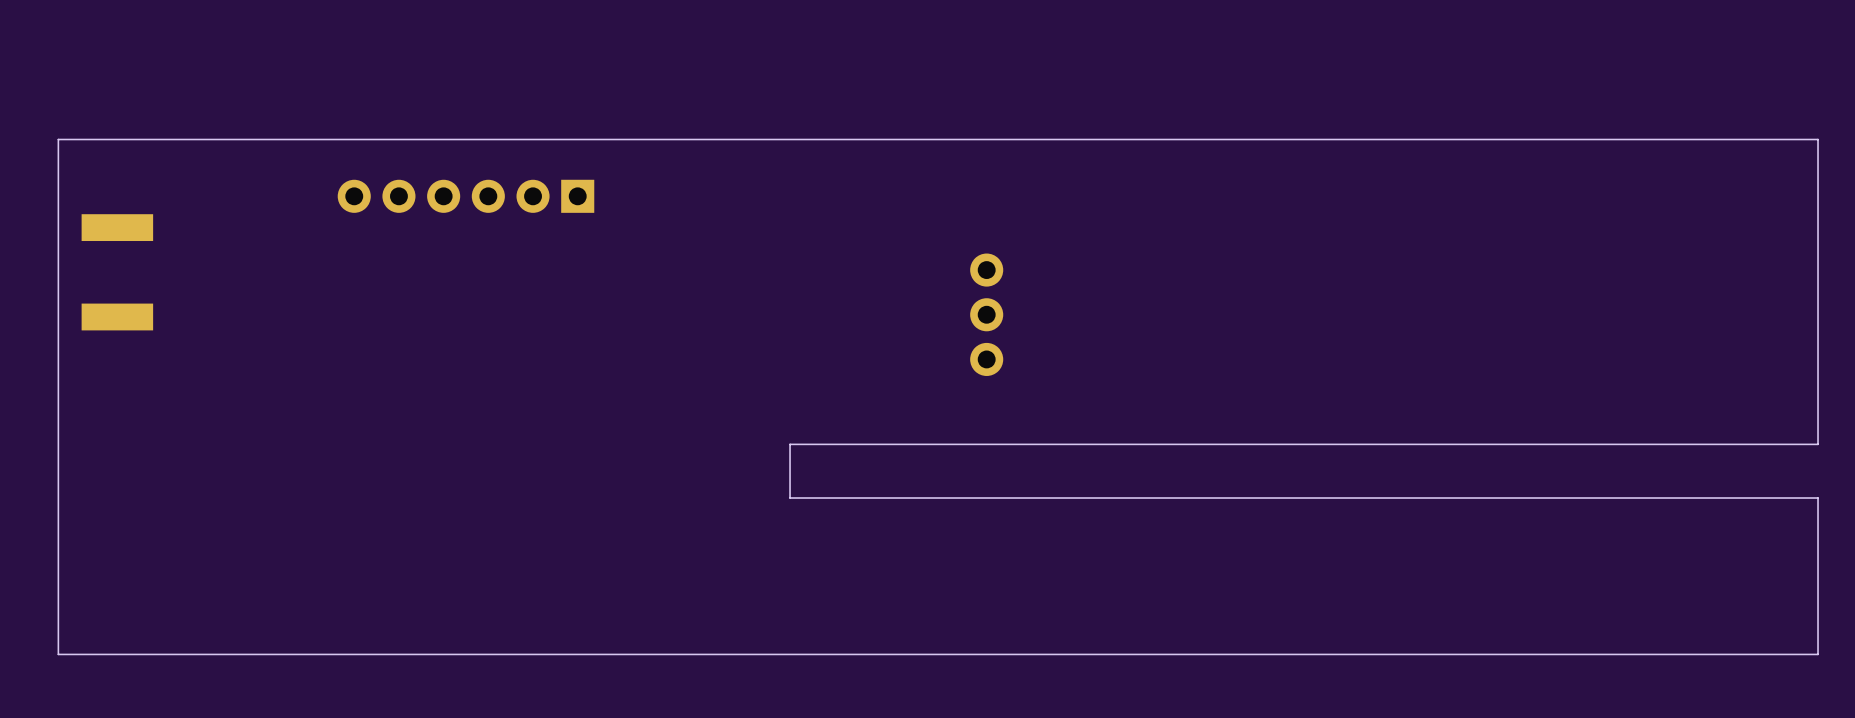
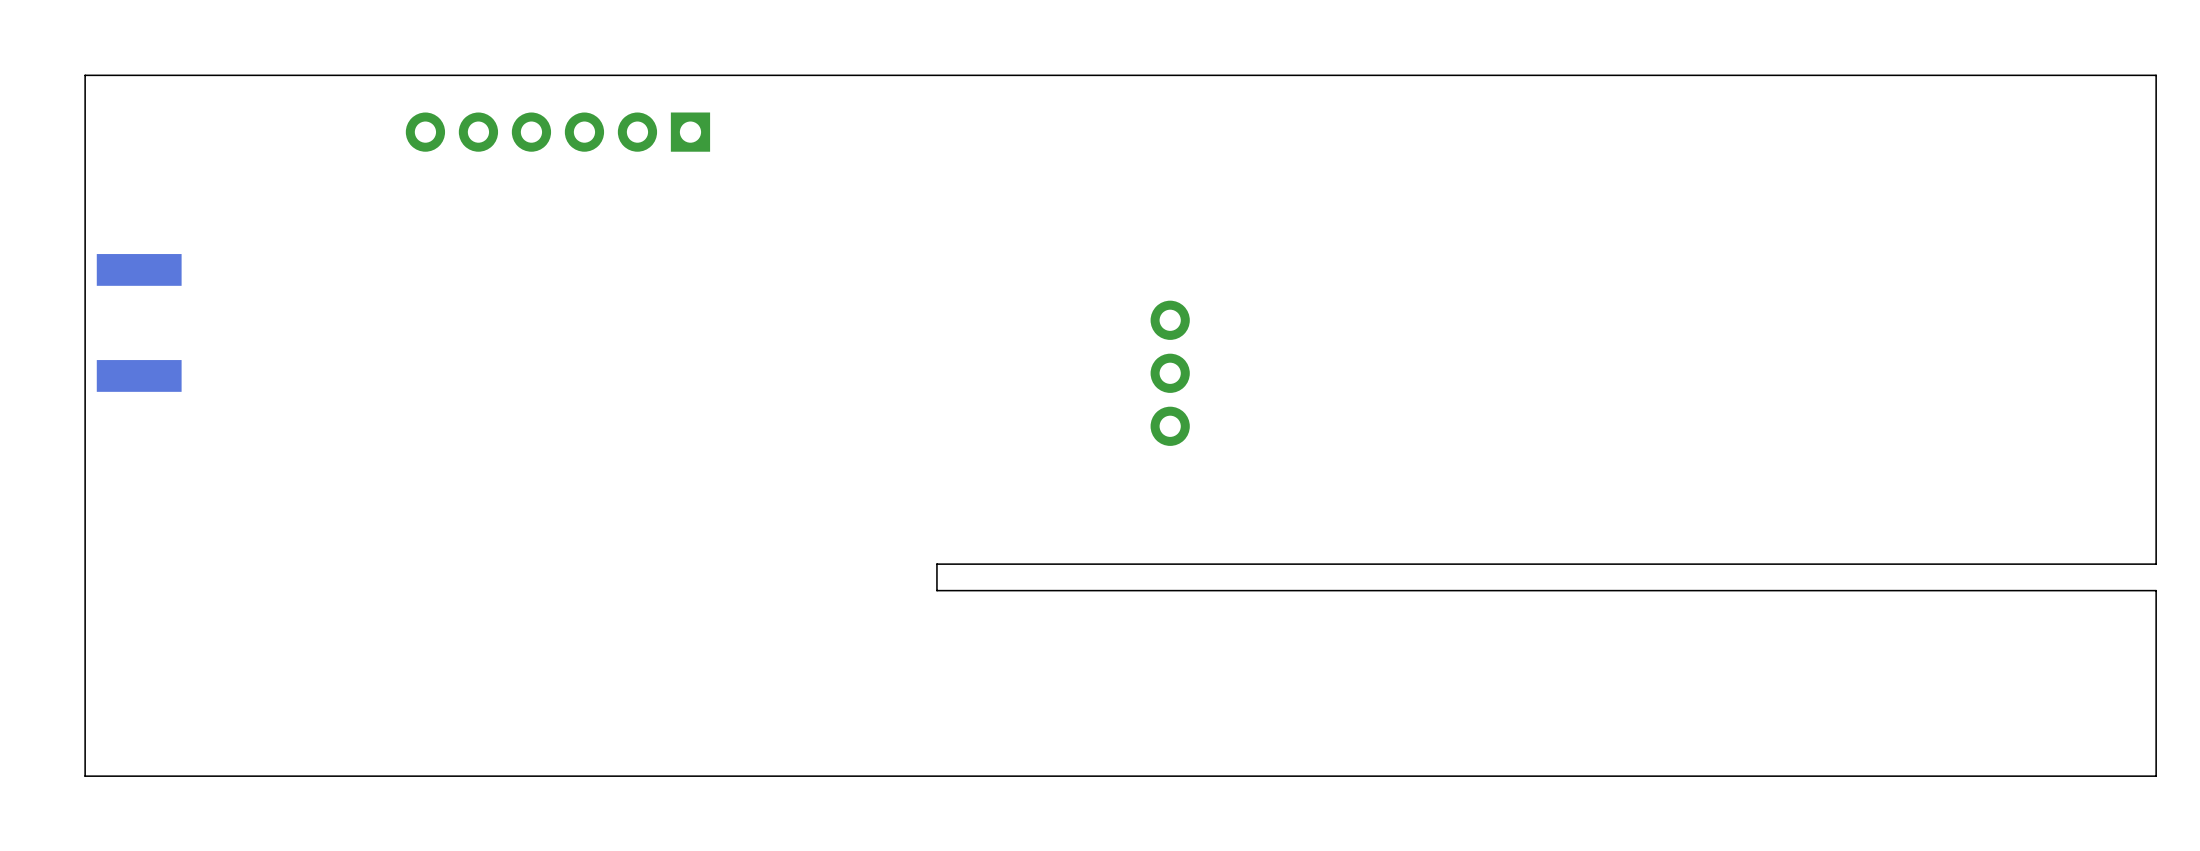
board edge: (1818, 139) (58, 139) (58, 654) (71, 654) -> (2156, 165) (2156, 75) (85, 75) (85, 776)
part position: (465, 196) -> (557, 132)
board edge: (1818, 444) (790, 444) (790, 475) -> (2156, 527) (2156, 564) (936, 564)

